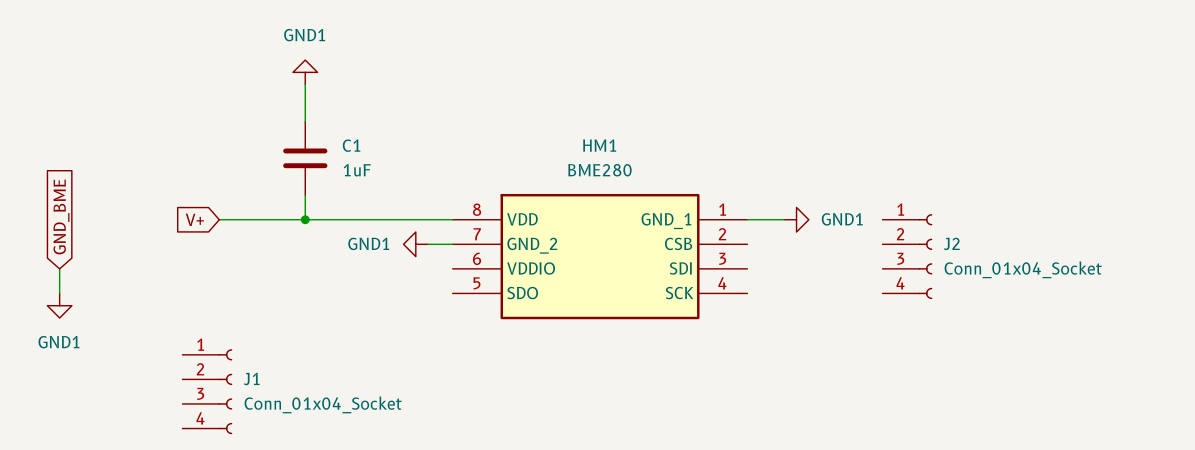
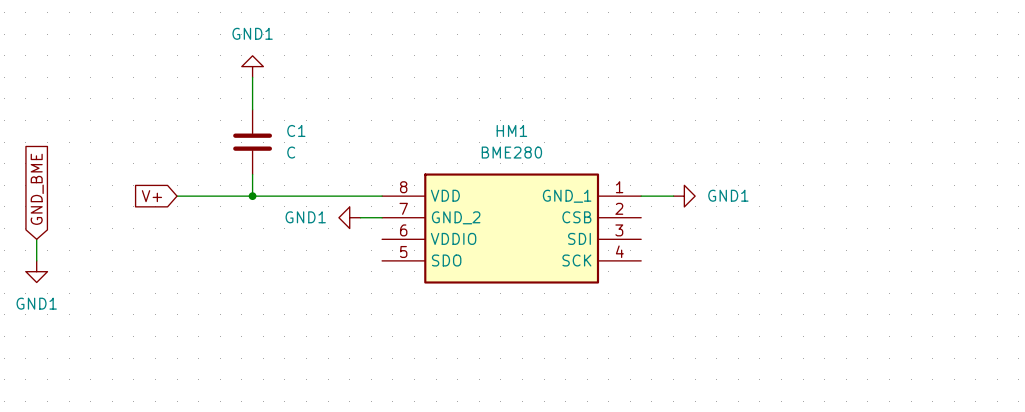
C1 value: 1uF (357, 170) -> C (291, 152)
J2: Conn_01x04_Socket (907, 256) -> none
J1: Conn_01x04_Socket (207, 391) -> none

